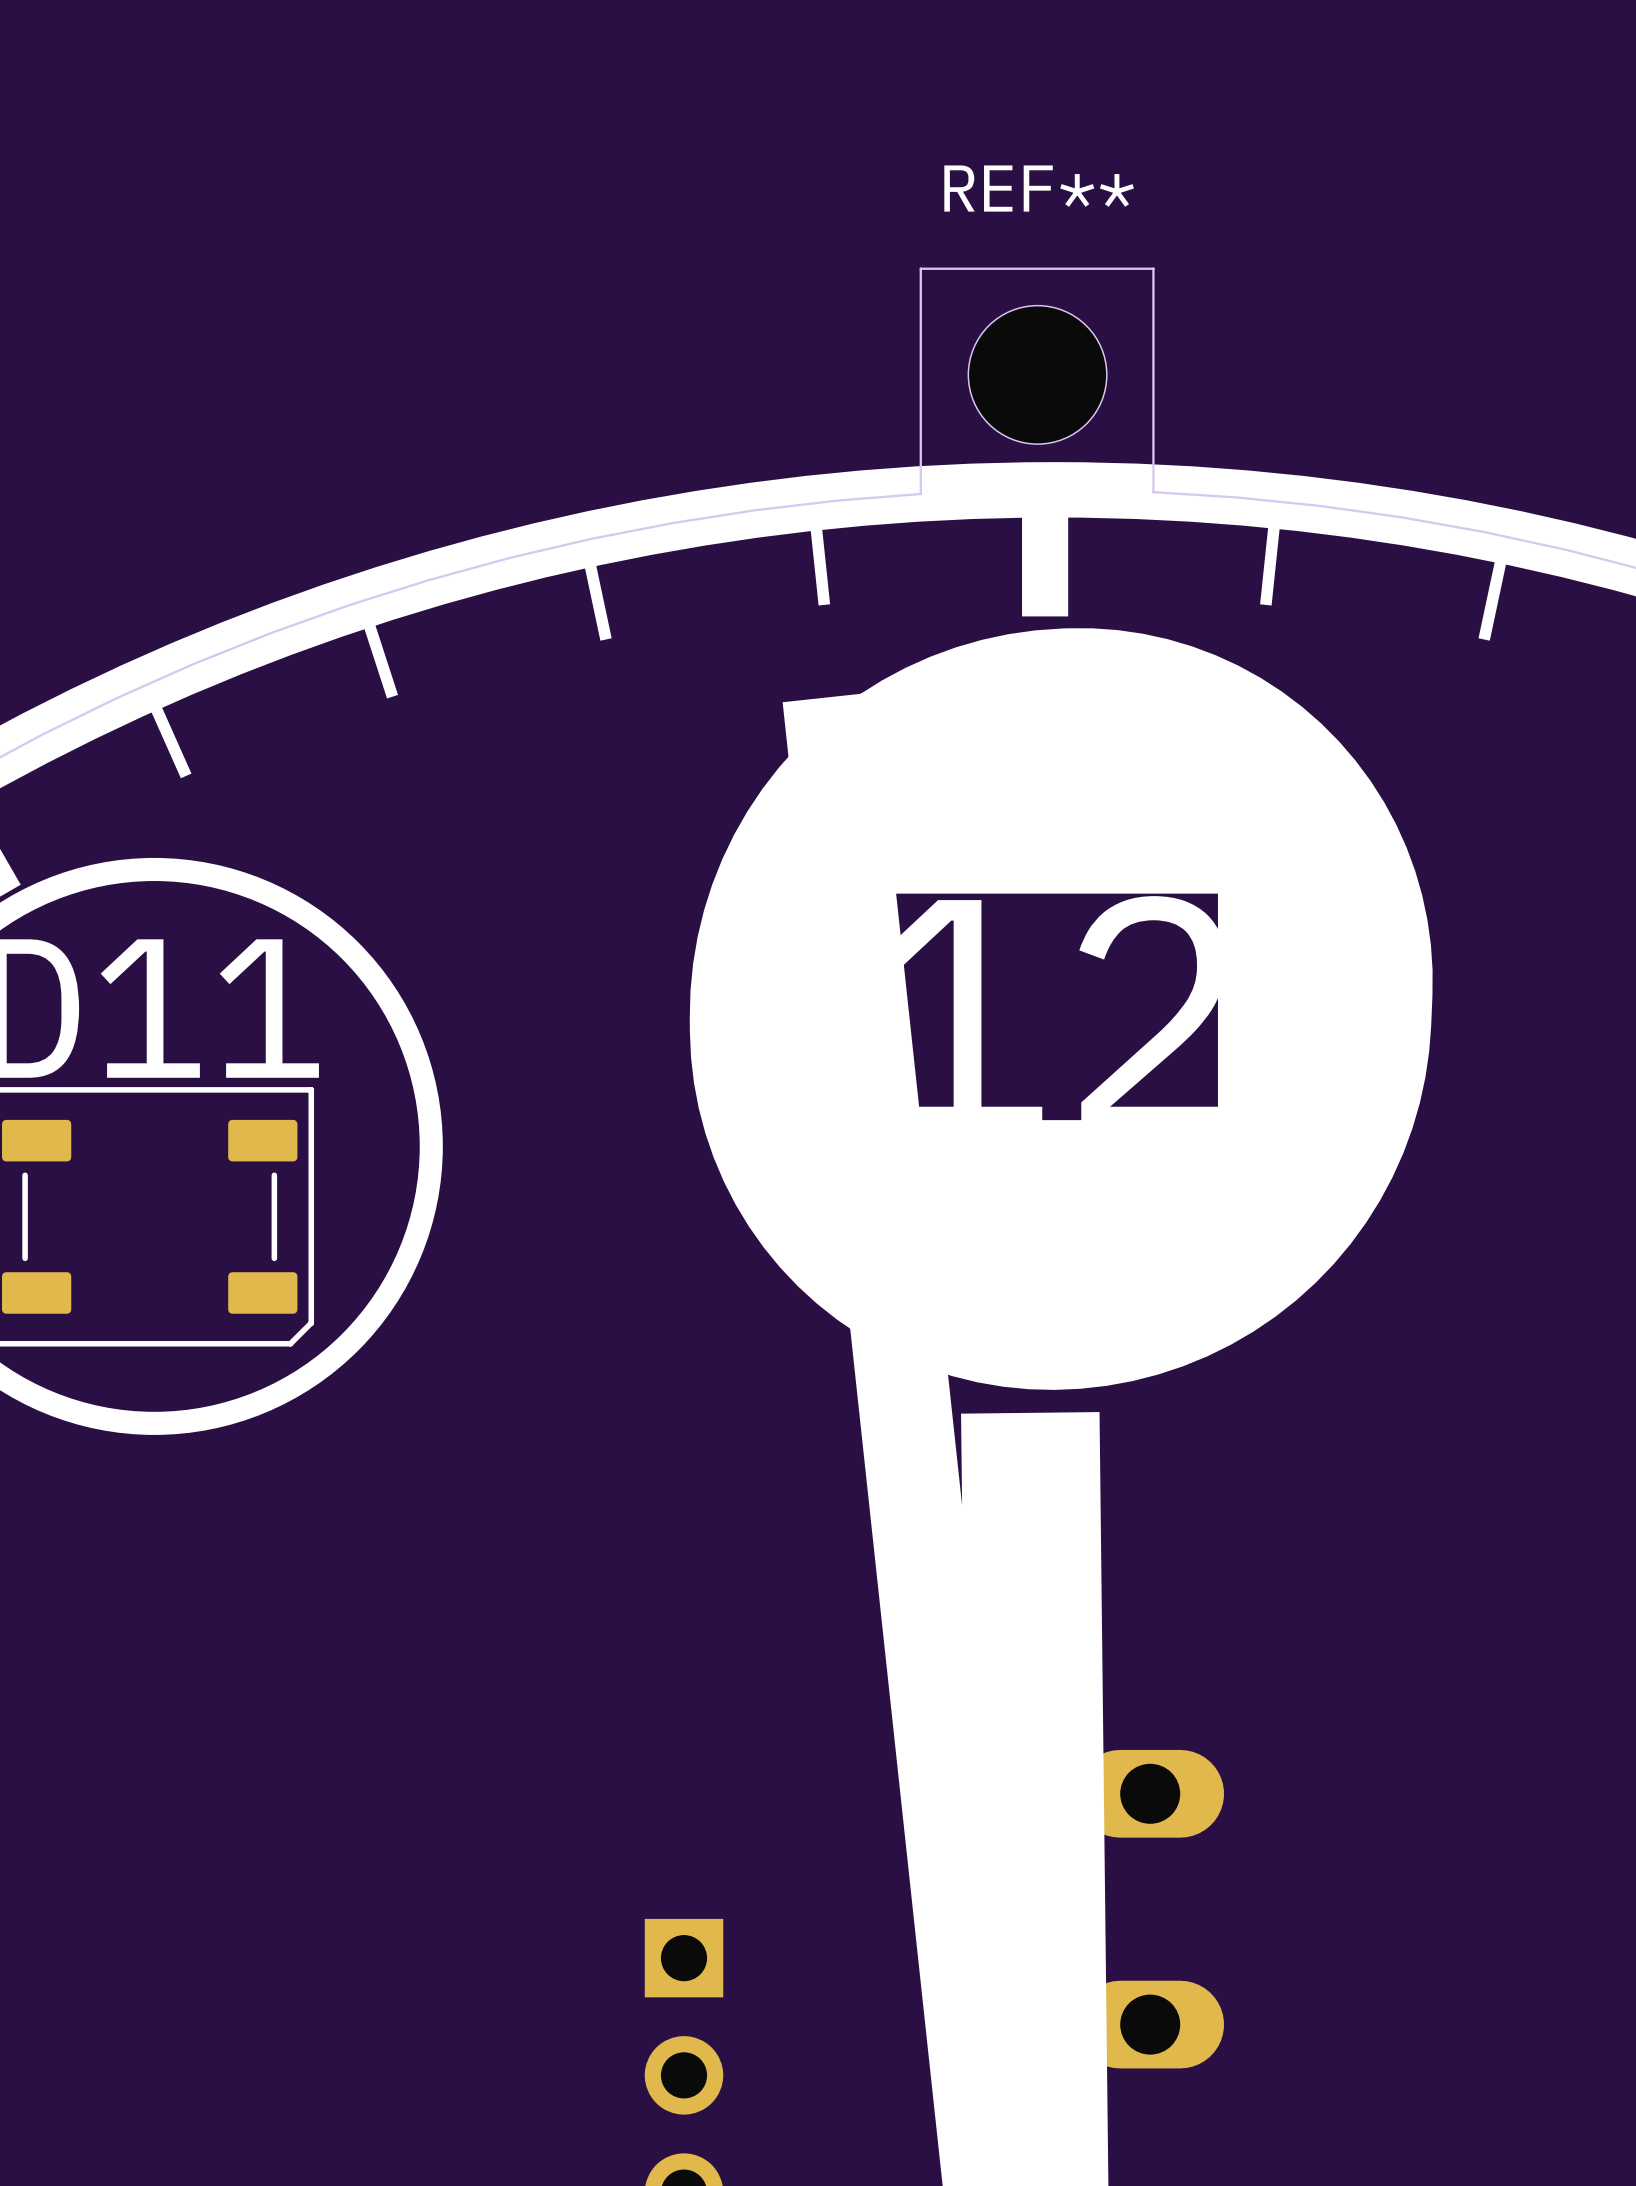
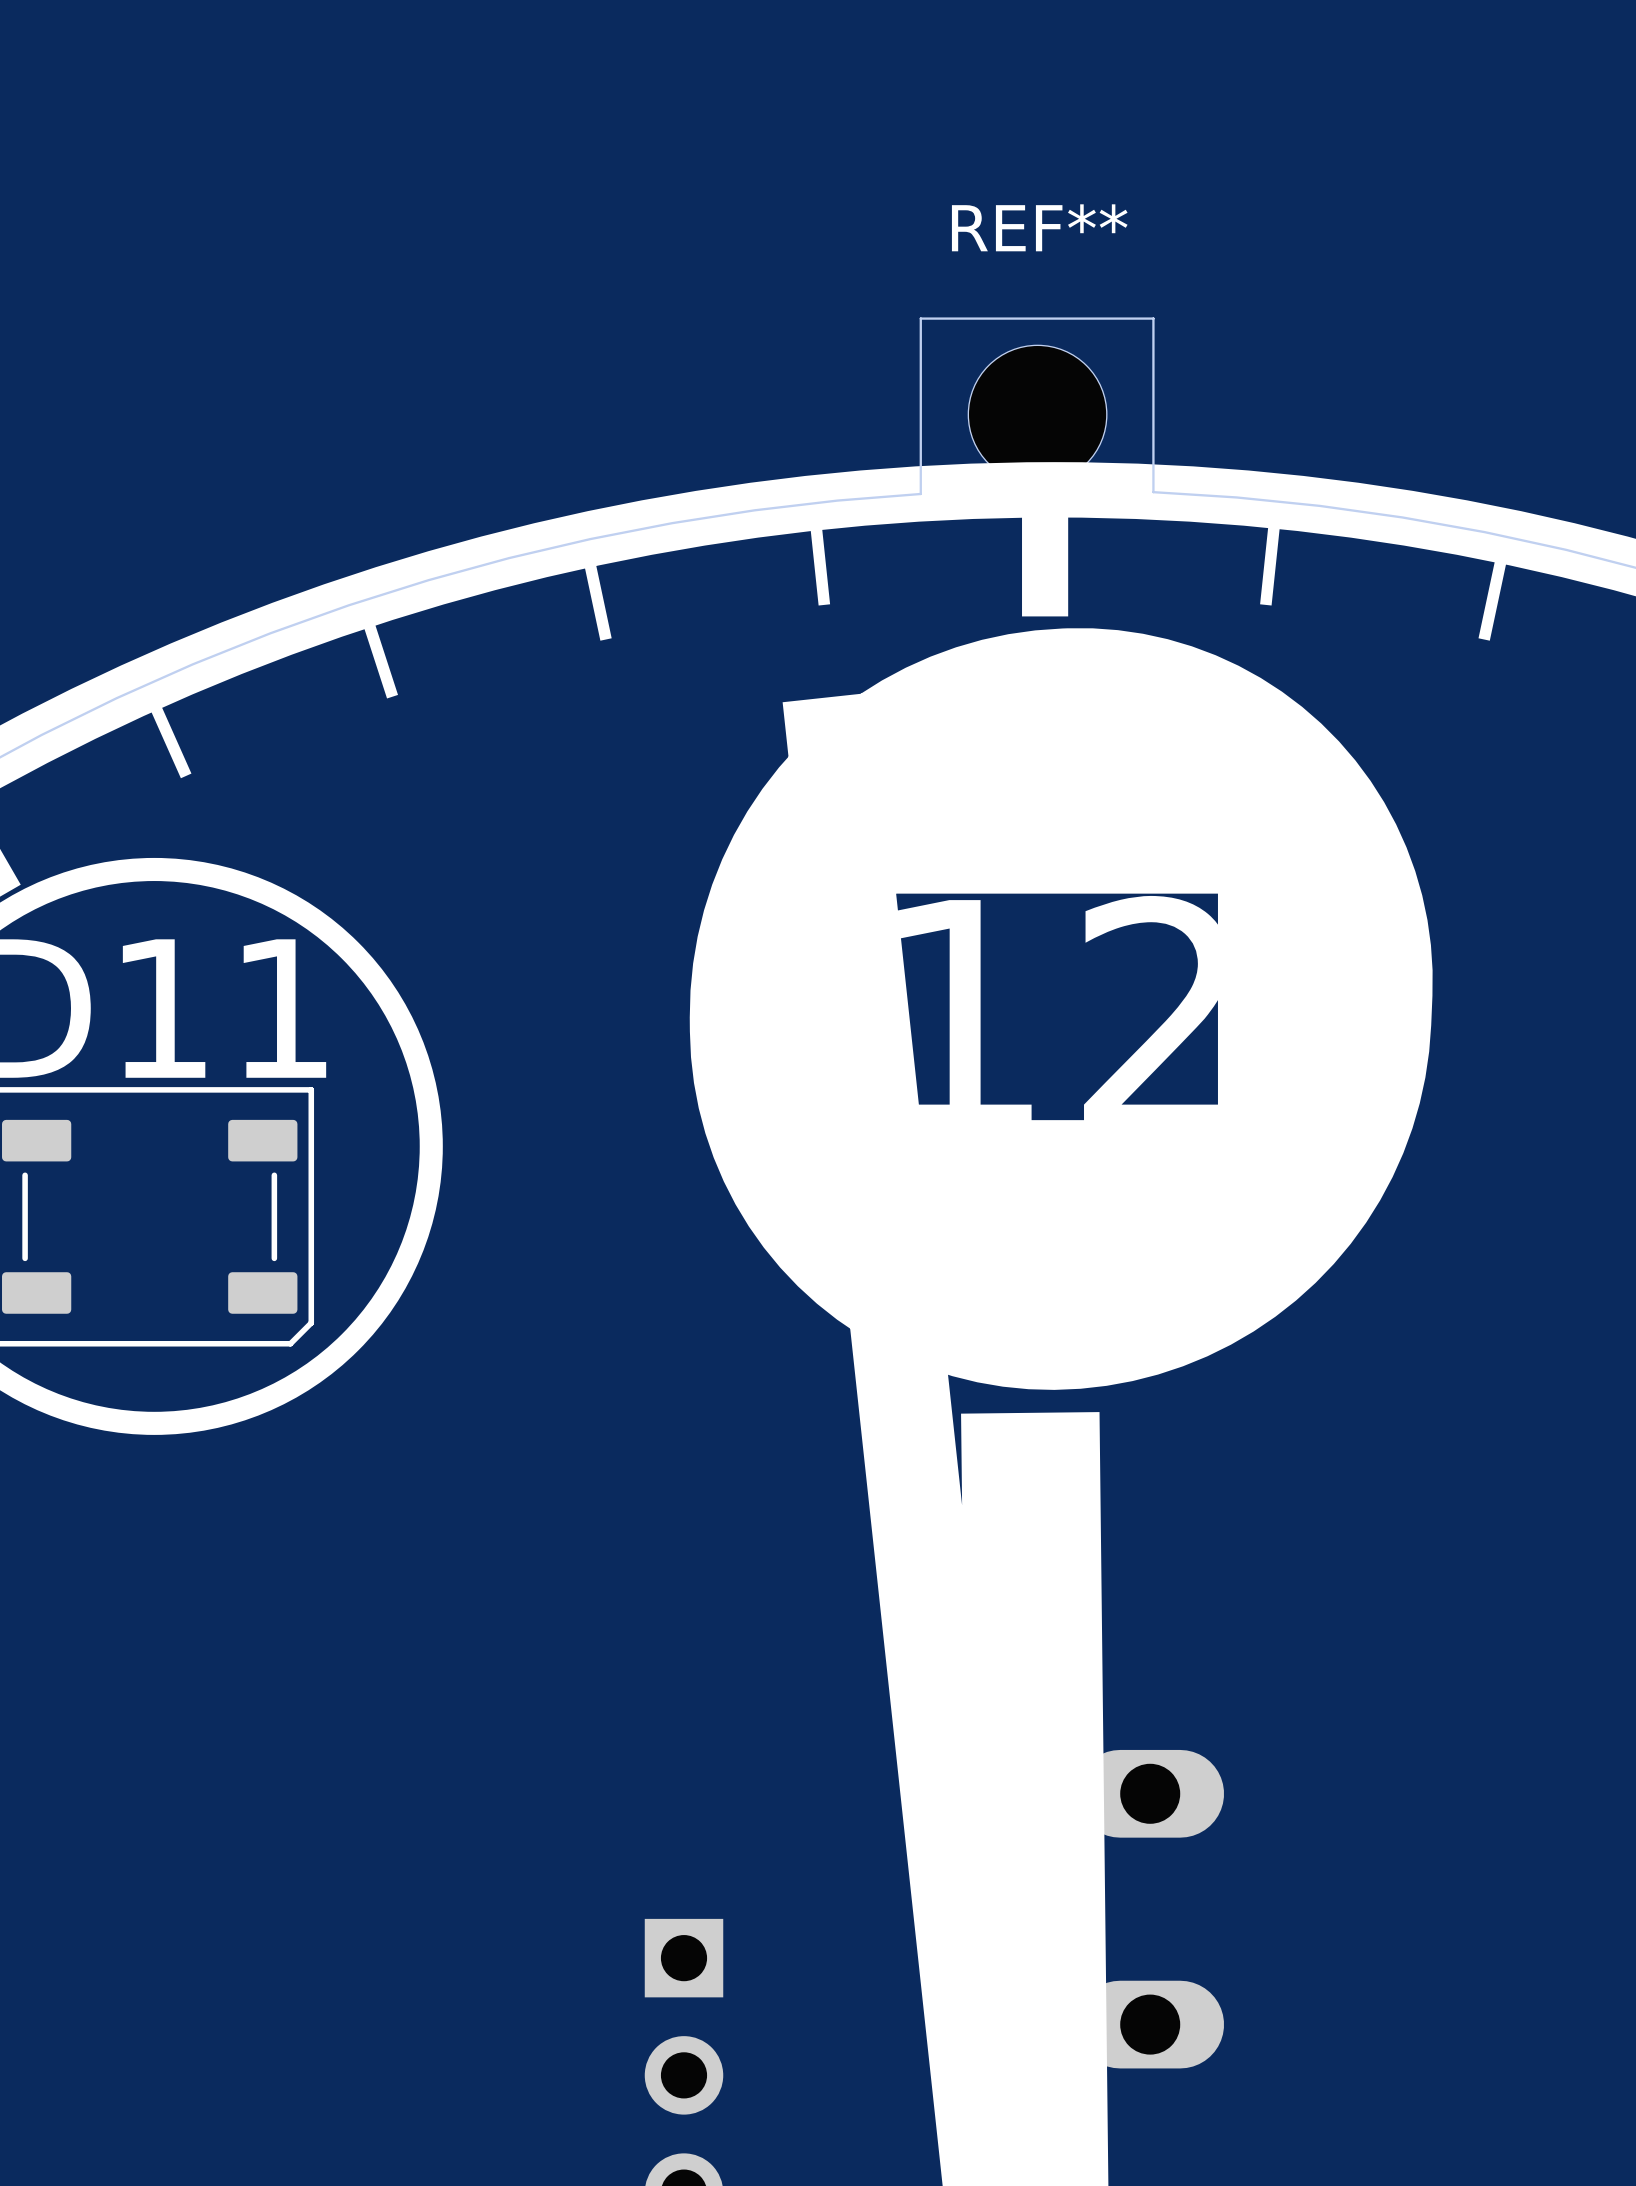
board edge: (920, 318) (920, 268) (1153, 268) (1153, 318) -> (920, 318) (1153, 318)
REF** position: (1037, 374) -> (1037, 414)

